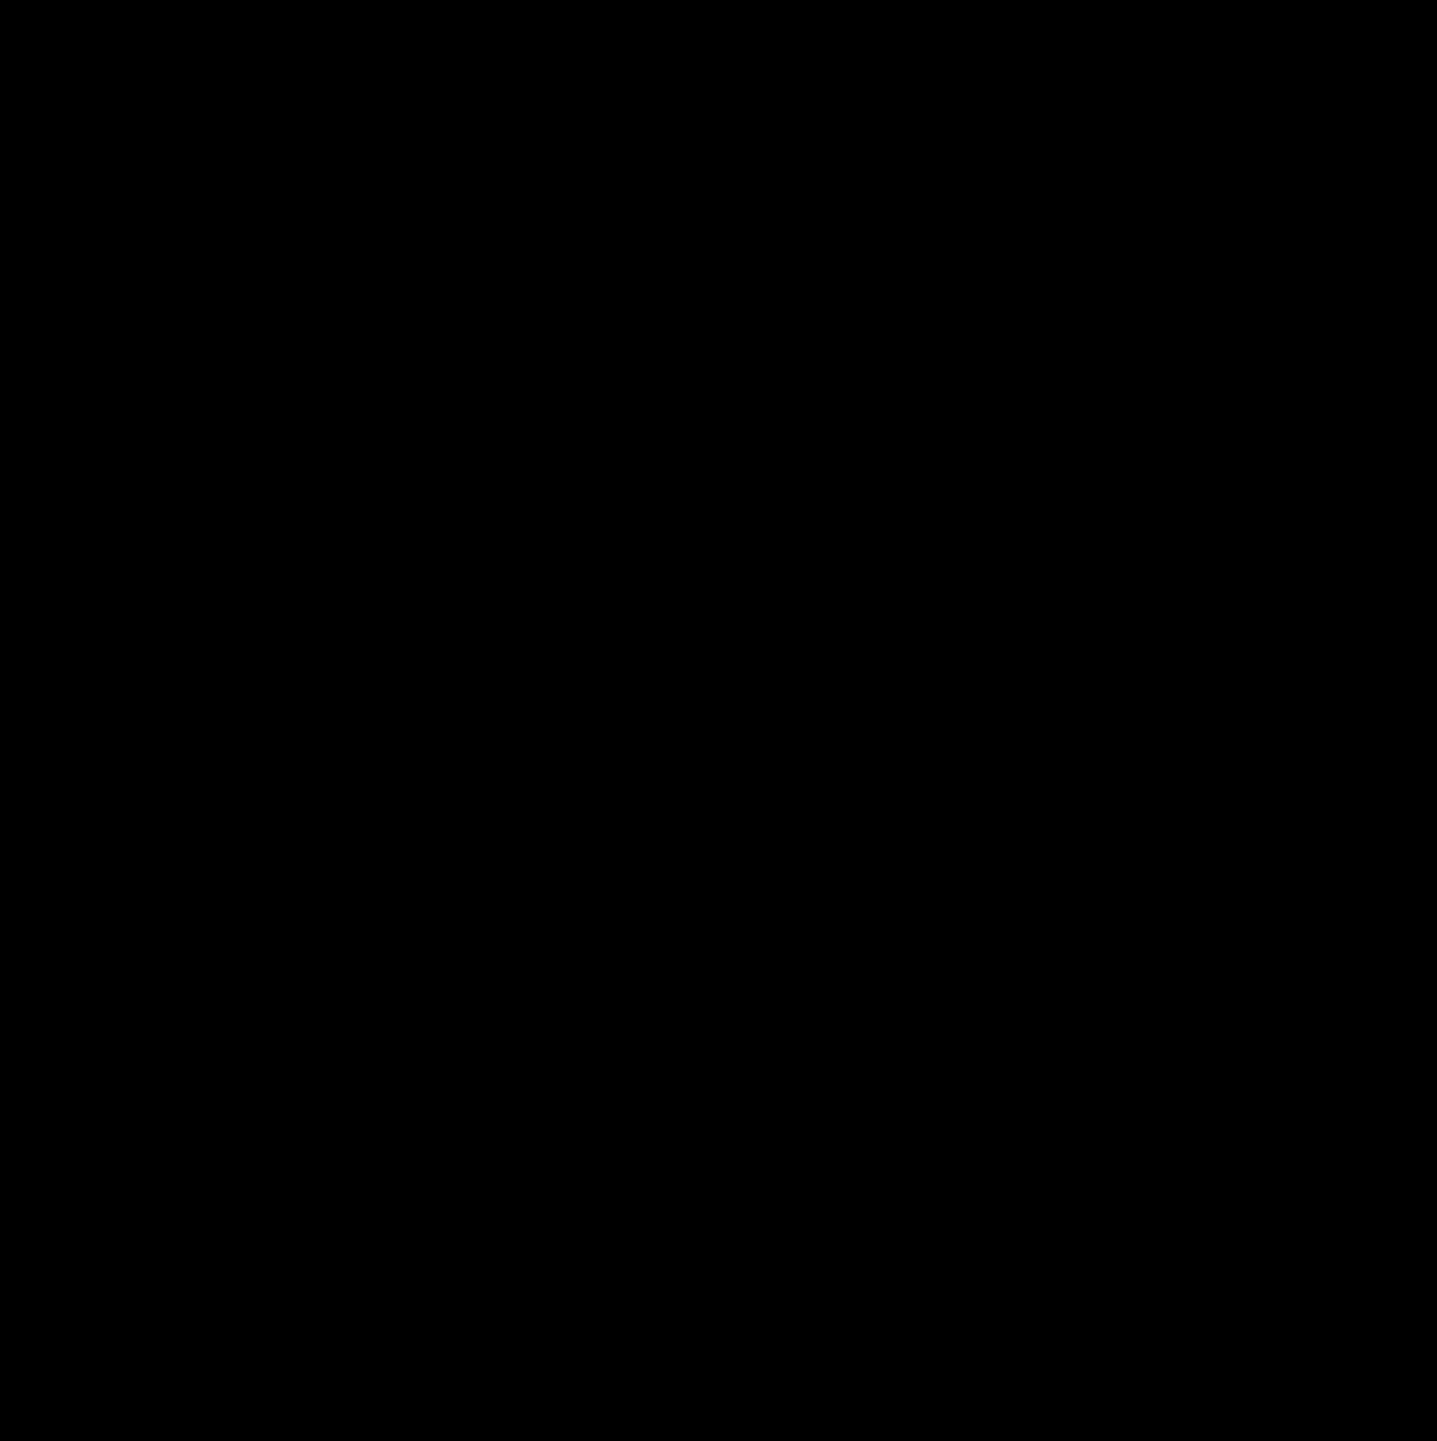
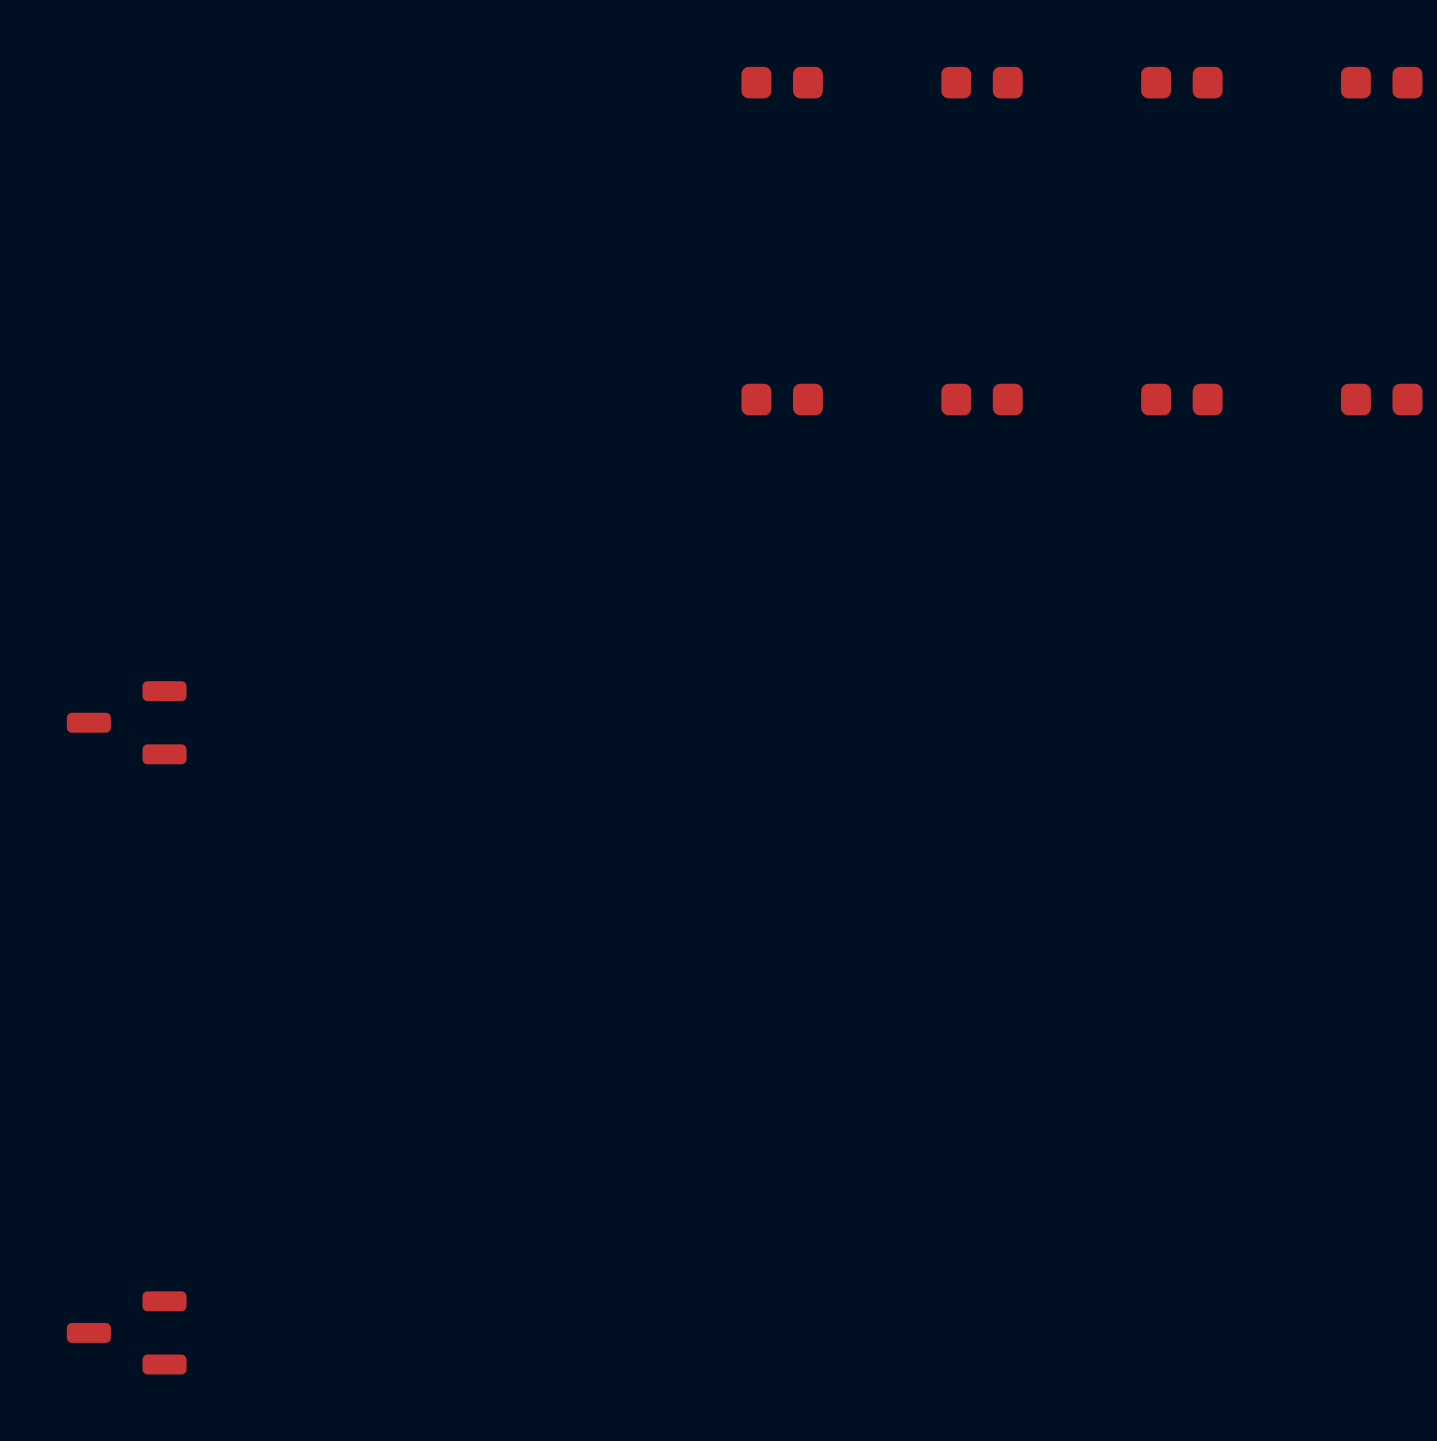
part: none -> (782, 82)
part: none -> (982, 82)
part: none -> (1181, 82)
part: none -> (1381, 82)
part: none -> (782, 399)
part: none -> (982, 399)
part: none -> (1181, 399)
part: none -> (1381, 399)
part: none -> (126, 722)
part: none -> (126, 1332)

